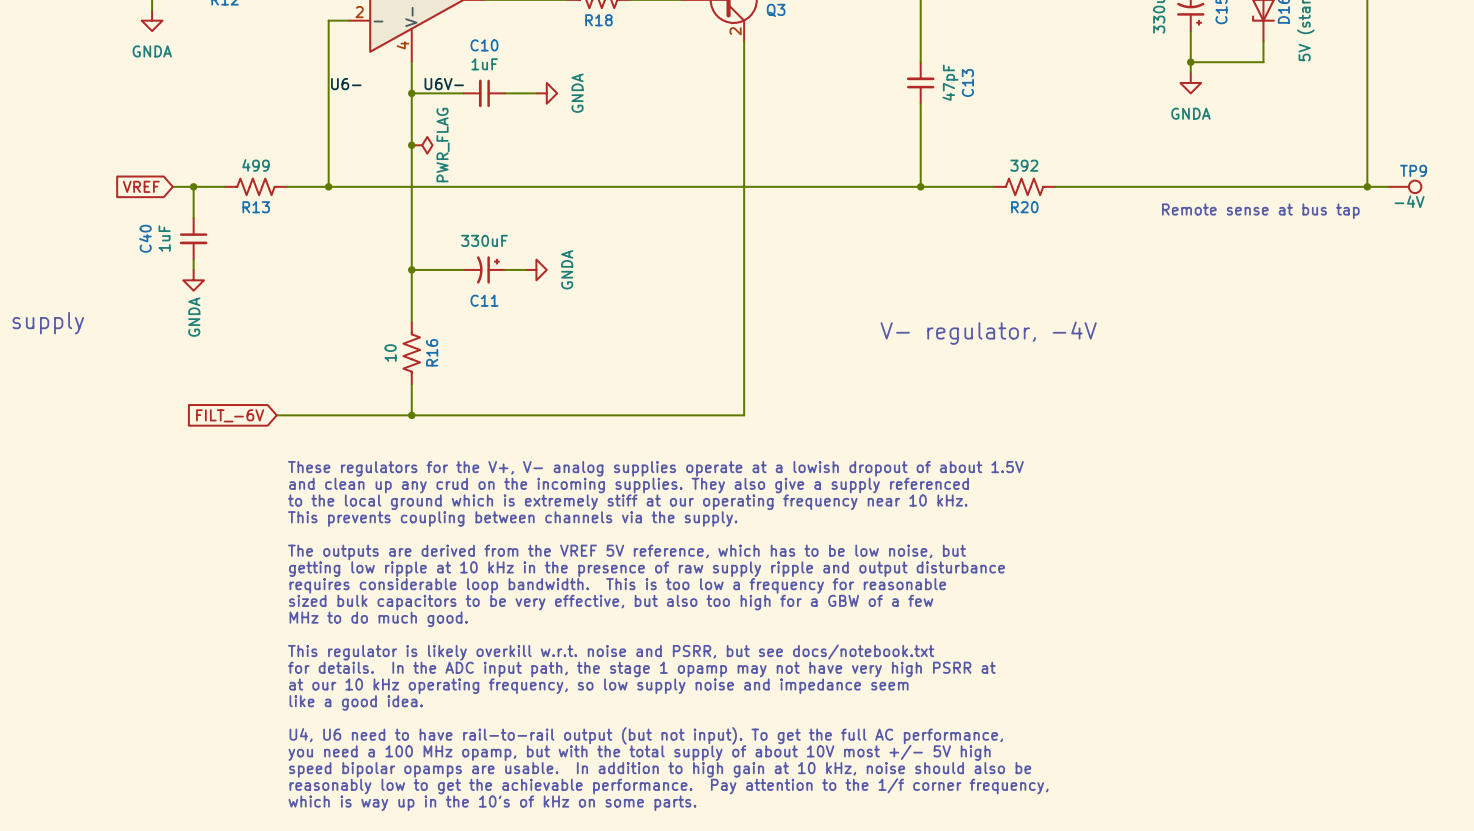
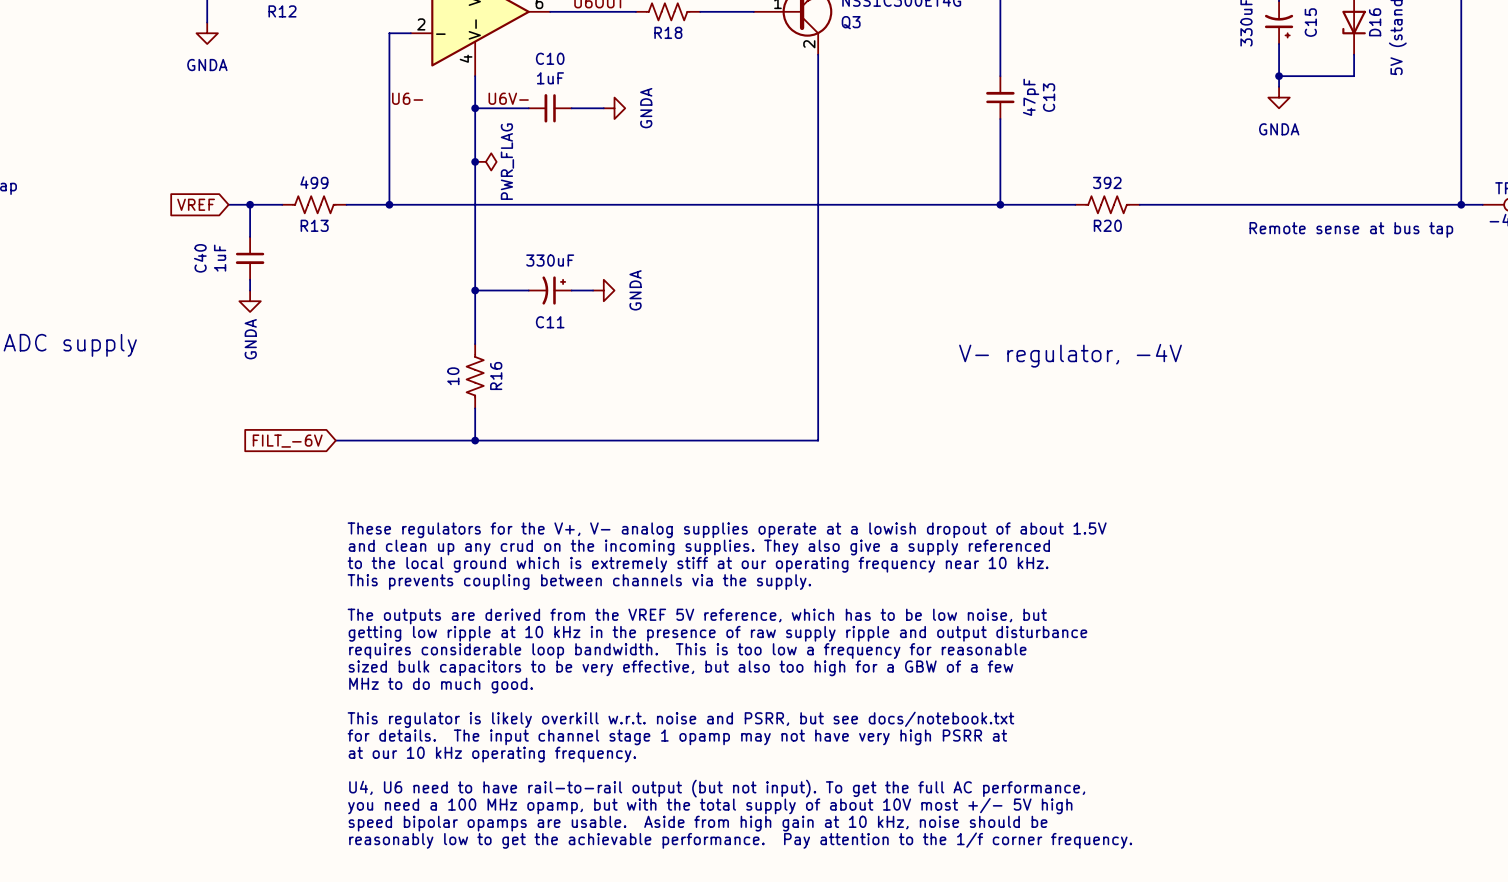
text: These regulators for the V+, V- analog supplies operate at a lowish dropout of about 1.5V (655, 468) -> none
text: and clean up any crud on the incoming supplies. They also give a supply referenced (628, 485) -> none
text: to the local ground which is extremely stiff at our operating frequency near 10 kHz. (627, 502) -> These regulators for the V+, V- analog supplies operate at a lowish dropout of about 1.5V (727, 530)
text: This prevents coupling between channels via the supply. (512, 518) -> and clean up any crud on the incoming supplies. They also give a supply referenced (699, 547)
text: none -> to the local ground which is extremely stiff at our operating frequency near 10 kHz. (698, 564)
text: The outputs are derived from the VREF 5V reference, which has to be low noise, but (626, 552) -> This prevents coupling between channels via the supply. (579, 582)
text: getting low ripple at 10 kHz in the presence of raw supply ripple and output disturbance (647, 569) -> none
text: requires considerable loop bandwidth. This is too low a frequency for reasonable (617, 585) -> The outputs are derived from the VREF 5V reference, which has to be low noise, but (697, 616)
text: sized bulk capacitors to be very effective, but also too high for a GBW of a few (611, 602) -> getting low ripple at 10 kHz in the presence of raw supply ripple and output disturbance (717, 633)
text: MHz to do much good. (378, 619) -> requires considerable loop bandwidth. This is too low a frequency for reasonable (687, 651)
text: none -> sized bulk capacitors to be very effective, but also too high for a GBW of a few (680, 668)
text: This regulator is likely overkill w.r.t. noise and PSRR, but see docs/notebook.txt (611, 652) -> MHz to do much good. (441, 685)
text: for details. In the ADC input path, the stage 1 opamp may not have very high PSRR at (641, 669) -> none
text: at our 10 kHz operating frequency, so low supply noise and impedance seem (598, 686) -> This regulator is likely overkill w.r.t. noise and PSRR, but see docs/notebook.txt (680, 719)
text: like a good idea. (356, 702) -> for details. The input channel stage 1 opamp may not have very high PSRR at (677, 737)
text: none -> at our 10 kHz operating frequency. (492, 754)
text: U4, U6 need to have rail-to-rail output (but not input). To get the full AC performance, (646, 735) -> none
text: you need a 100 MHz opamp, but with the total supply of about 10V most +/- 5V high (639, 752) -> U4, U6 need to have rail-to-rail output (but not input). To get the full AC performance, (717, 788)
text: speed bipolar opamps are usable. In addition to high gain at 10 kHz, noise should also be (660, 769) -> you need a 100 MHz opamp, but with the total supply of about 10V most +/- 5V high (710, 806)
text: reasonably low to get the achievable performance. Pay attention to the 1/f corner frequency, (669, 786) -> speed bipolar opamps are usable. Aside from high gain at 10 kHz, noise should be (698, 823)
text: which is way up in the 10's of kHz on some parts. (492, 803) -> reasonably low to get the achievable performance. Pay attention to the 1/f corner frequency. (740, 840)

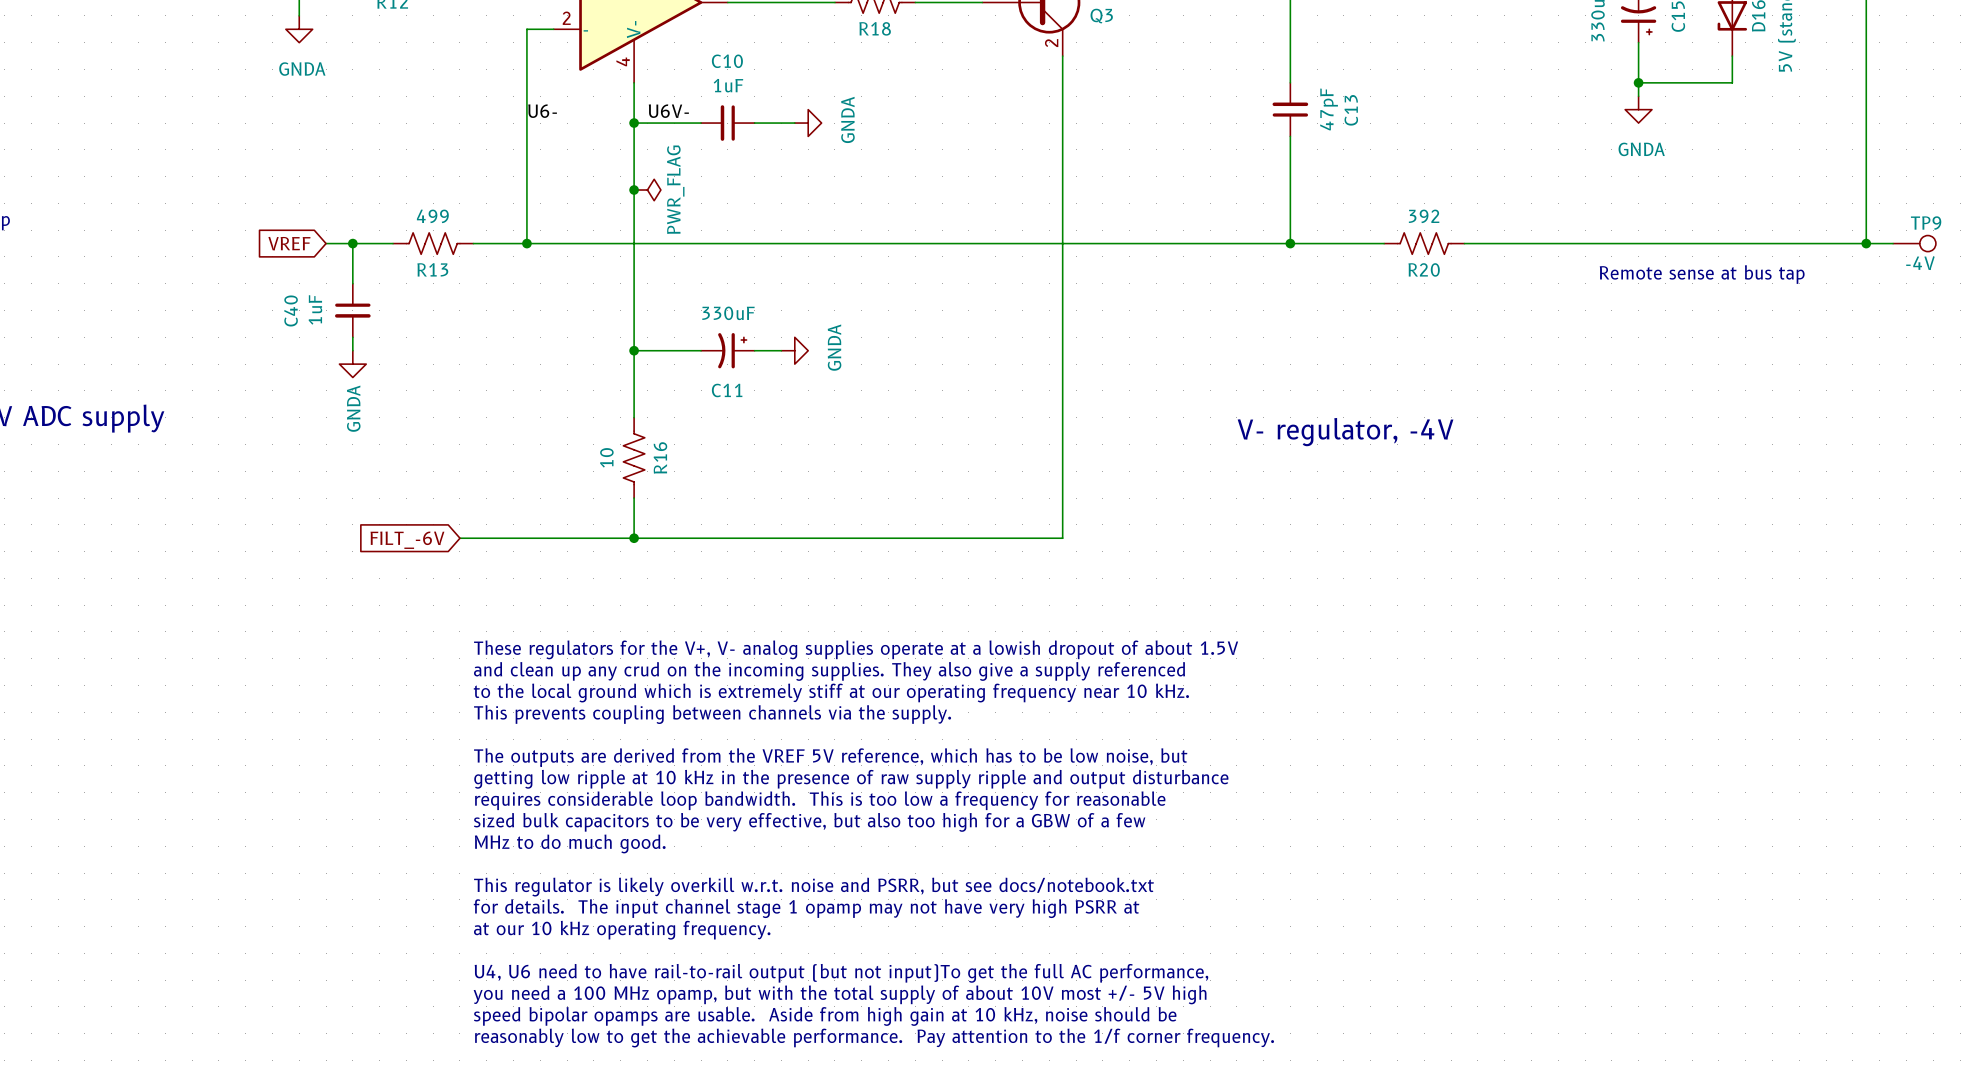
text: U4, U6 need to have rail-to-rail output (but not input). To get the full AC performance, (717, 788) -> U4, U6 need to have rail-to-rail output (but not input)To get the full AC performance, (841, 973)

